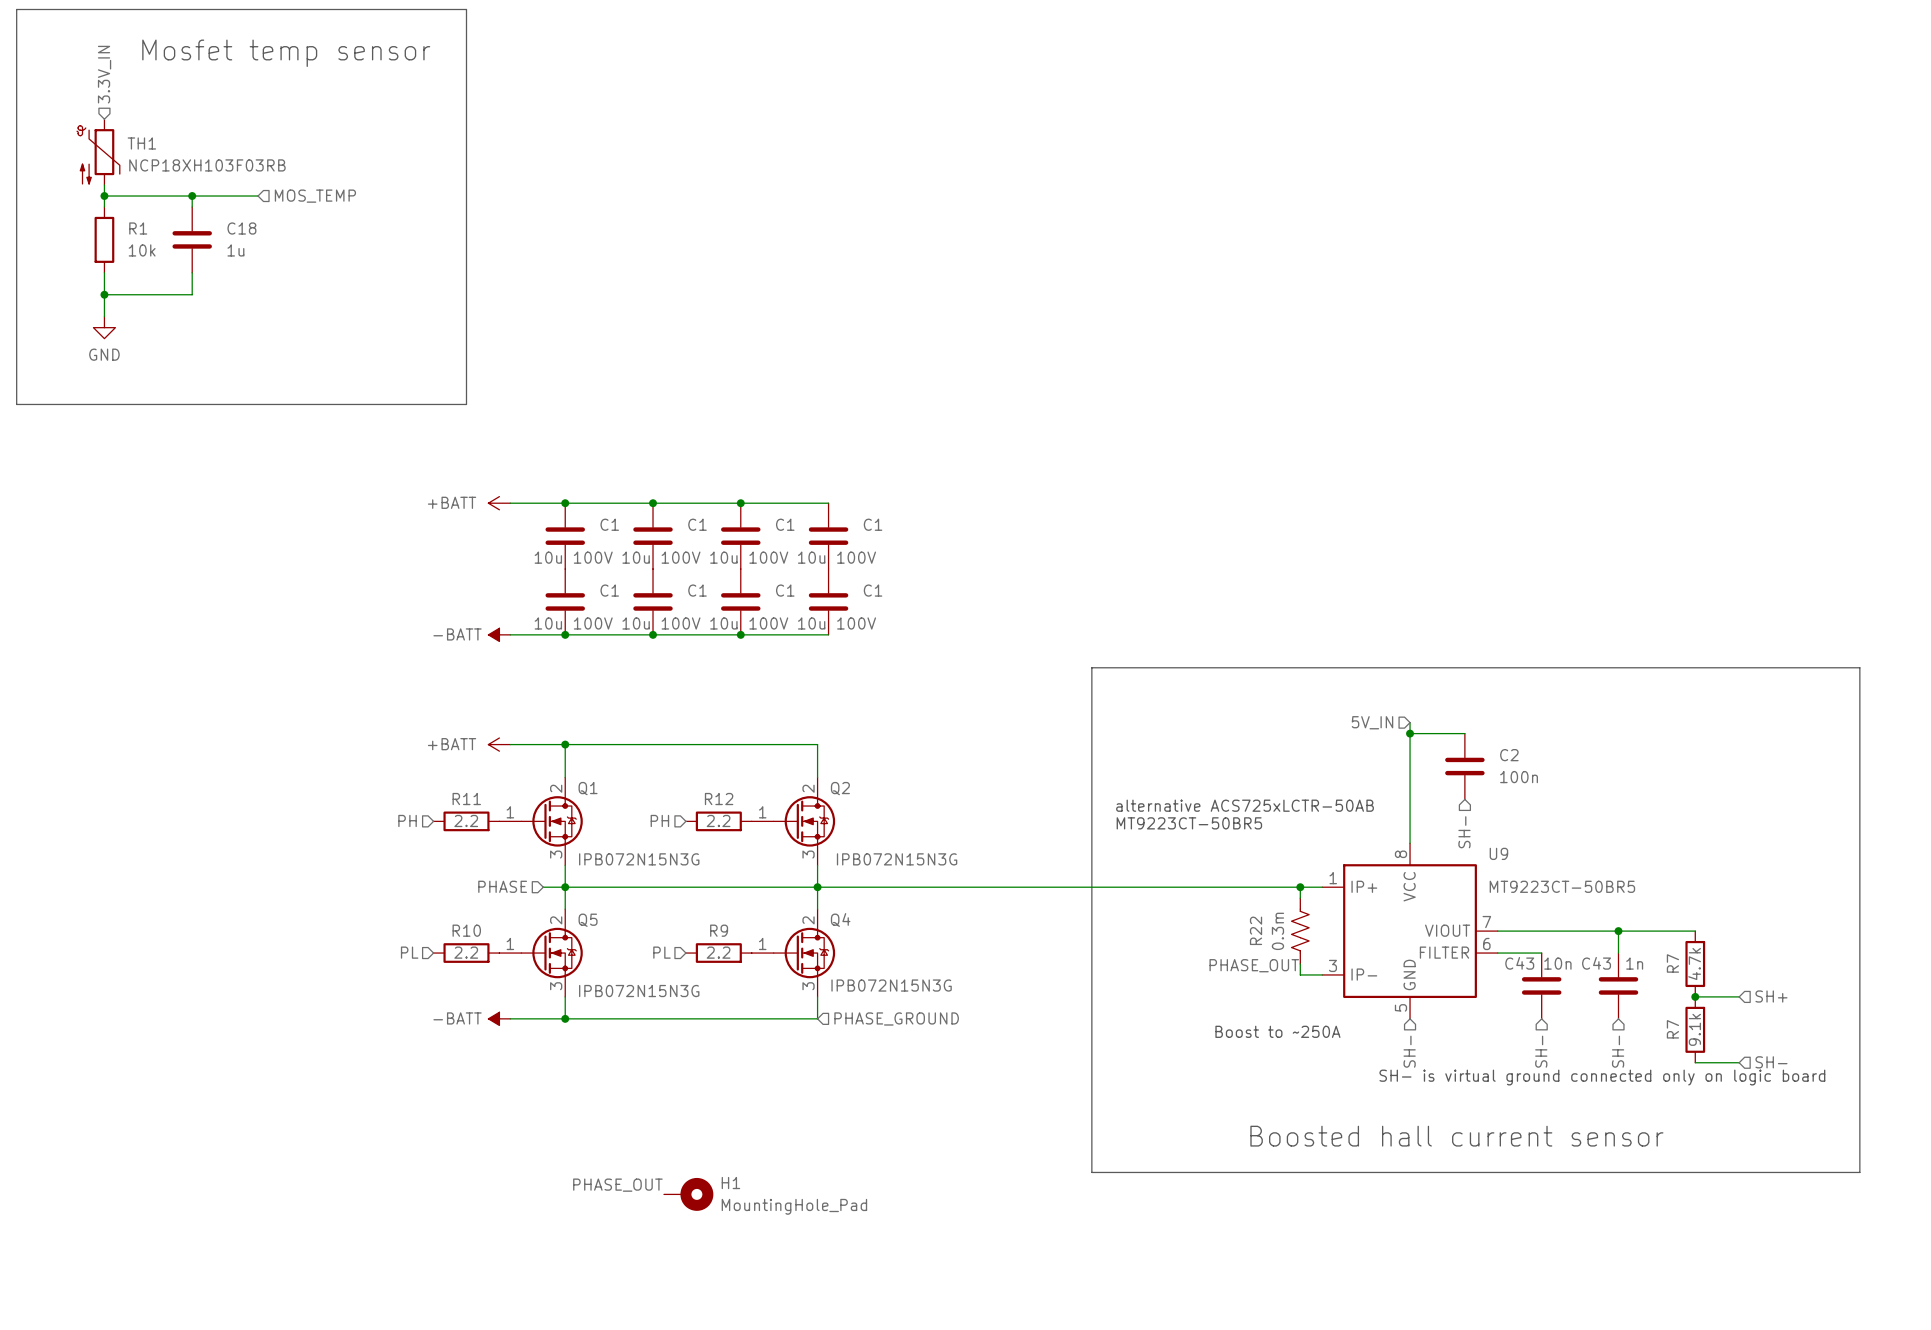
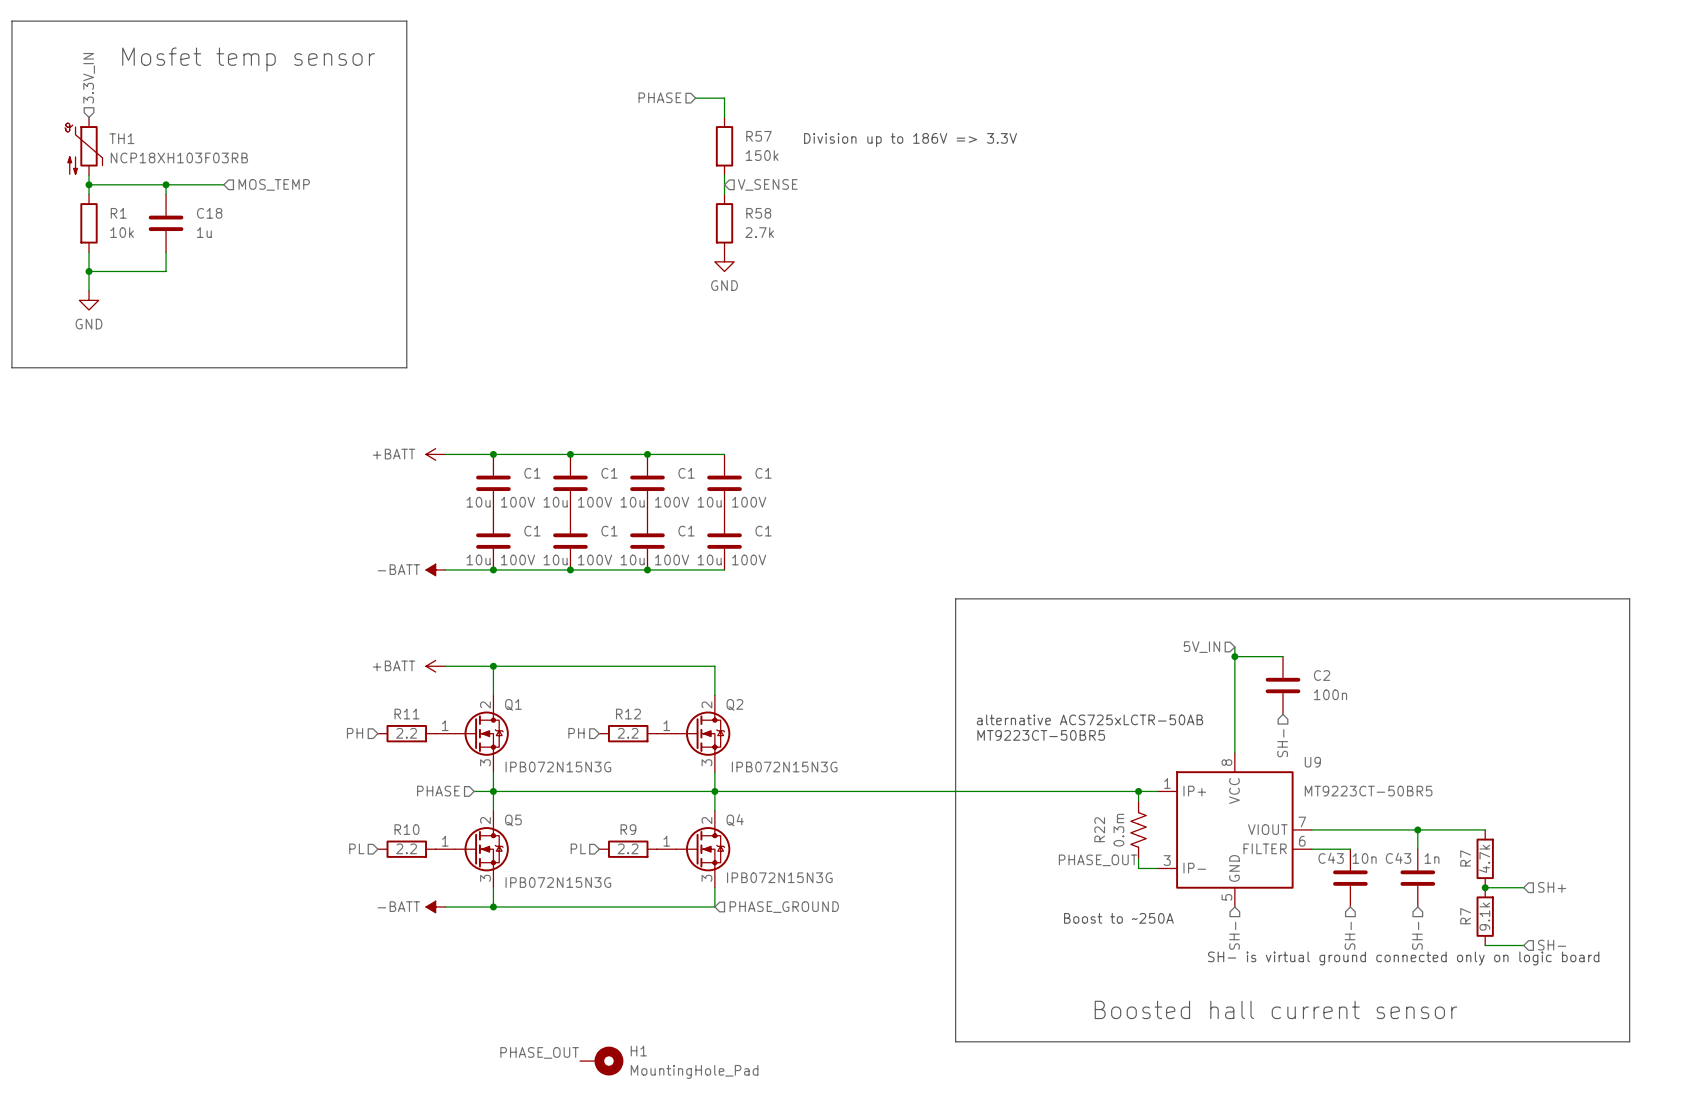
hierarchical label: none -> PHASE (659, 97)
wire: none -> (695, 98) (724, 98) (724, 117)
text: none -> Division up to 186V => 3.3V (910, 140)
R57: none -> 150k (724, 146)
wire: none -> (724, 175) (724, 194)
hierarchical label: none -> V_SENSE (767, 184)
R58: none -> 2.7k (724, 223)
power symbol: none -> GND (724, 261)

